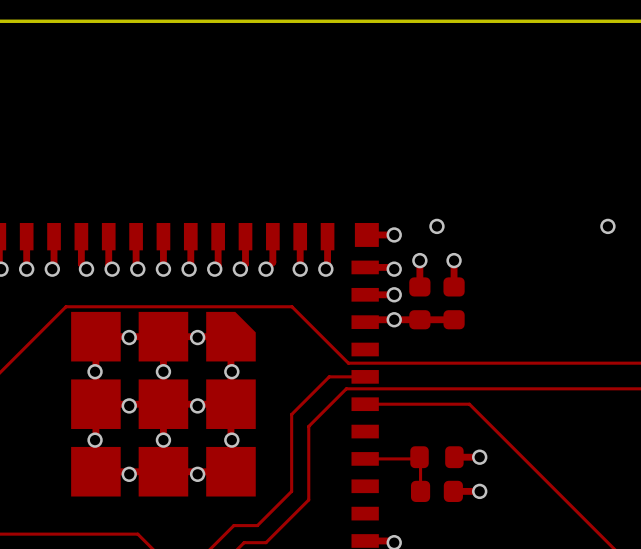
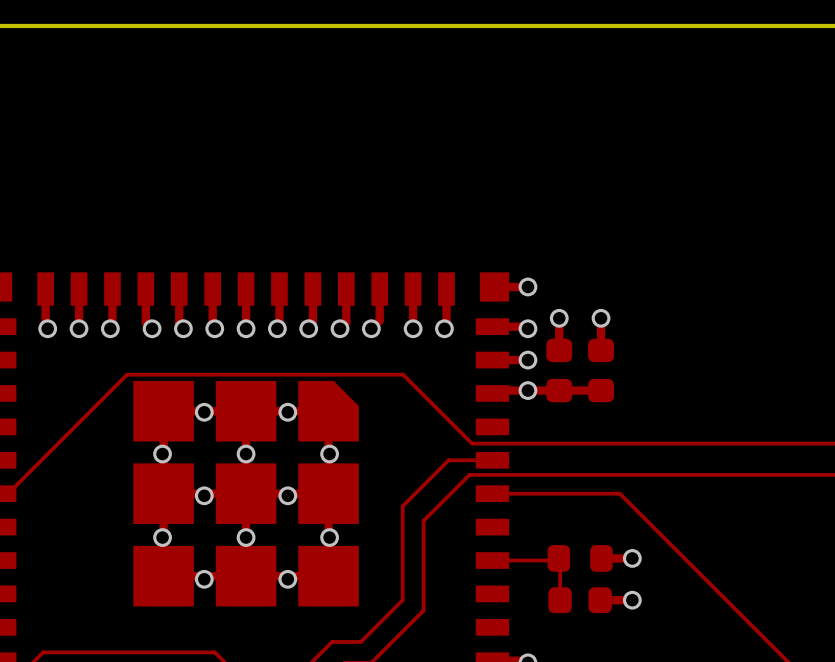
via: (436, 226) -> none
via: (607, 226) -> none

